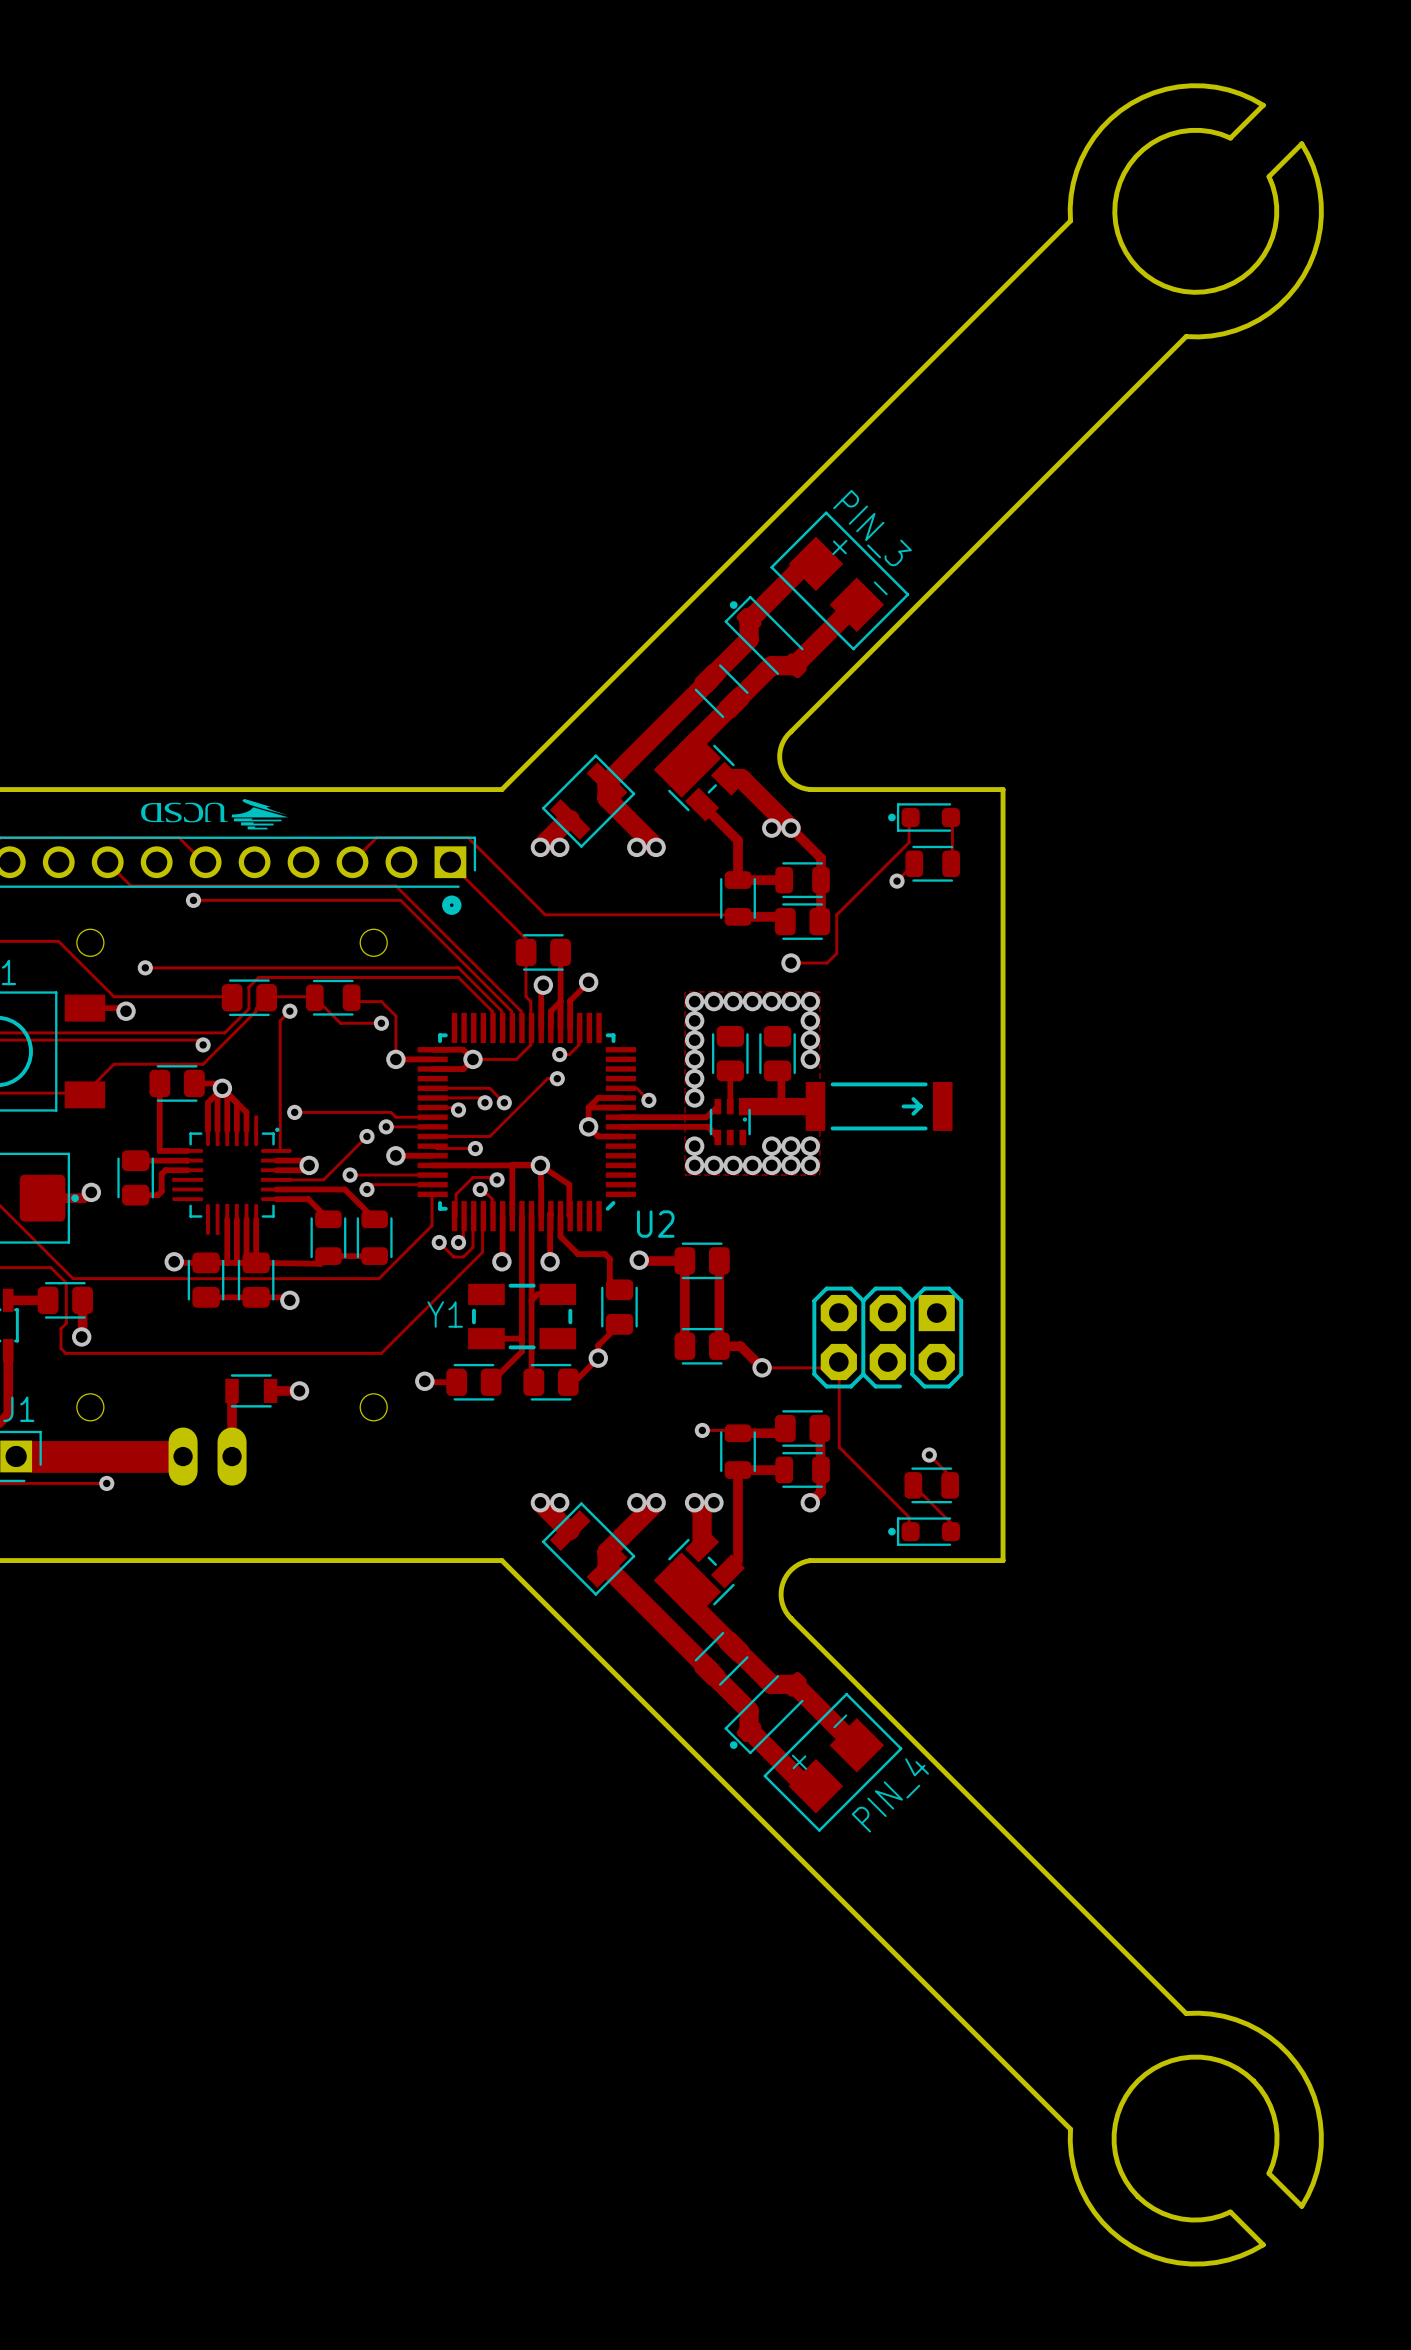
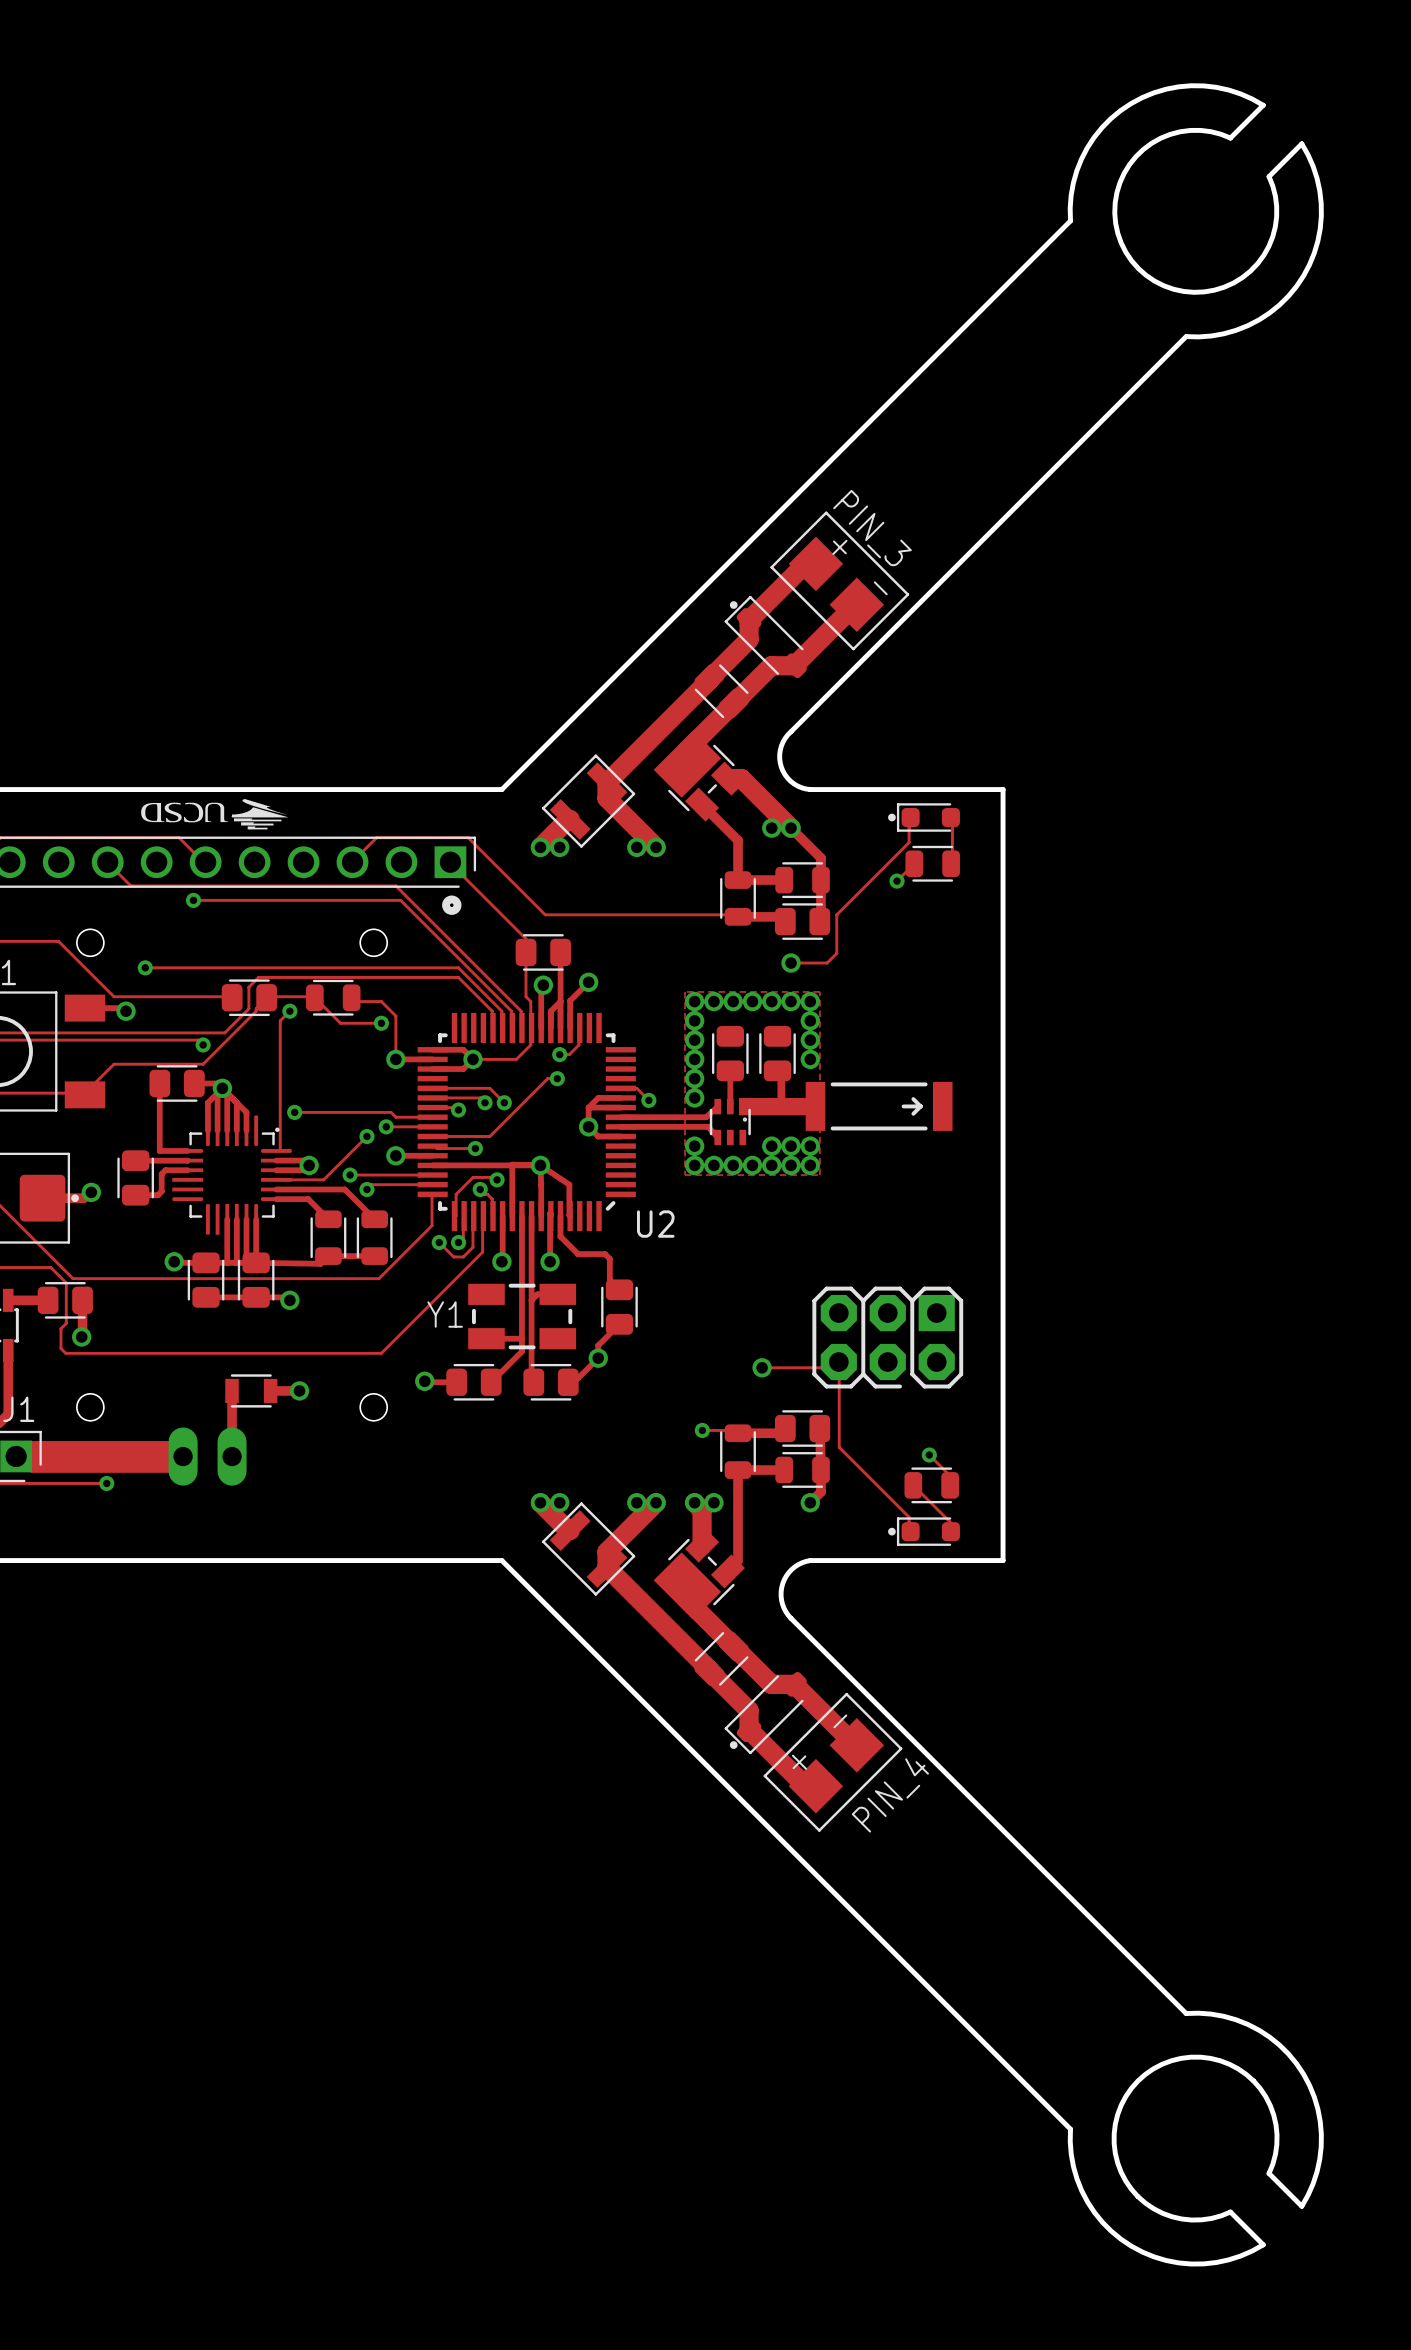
track: (639, 1260) (682, 1261) -> none
via: (639, 1260) -> none
track: (682, 1260) (684, 1260) (684, 1346) -> none
part: (702, 1260) -> none
track: (719, 1260) (719, 1346) (740, 1346) (762, 1367) -> none
part: (702, 1346) -> none

